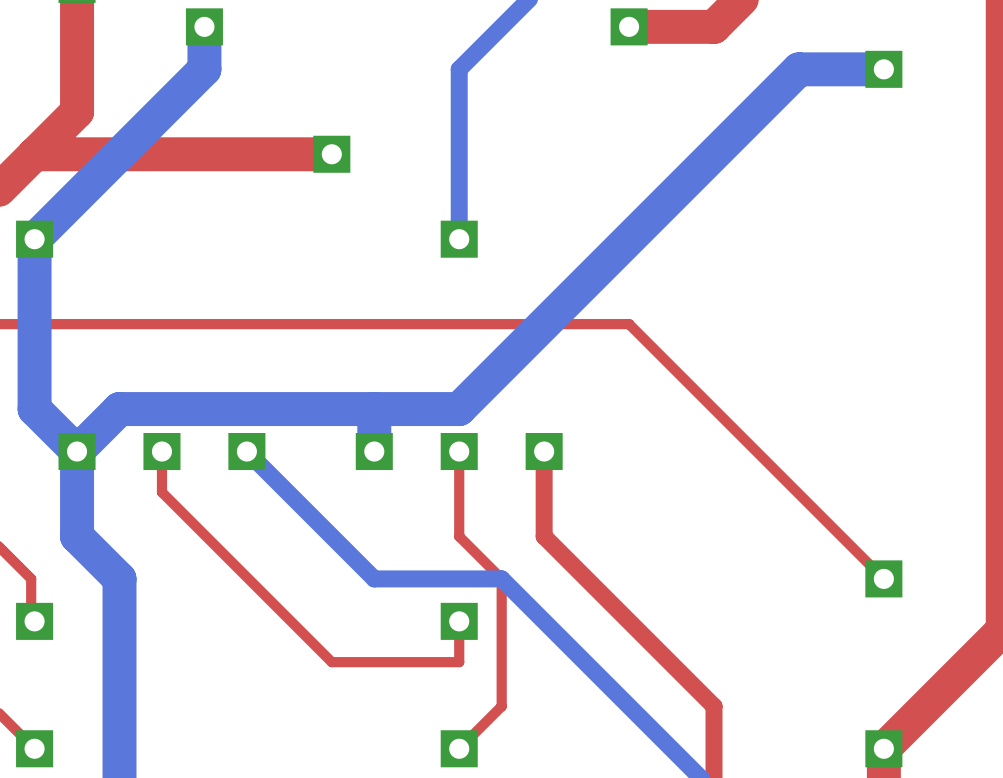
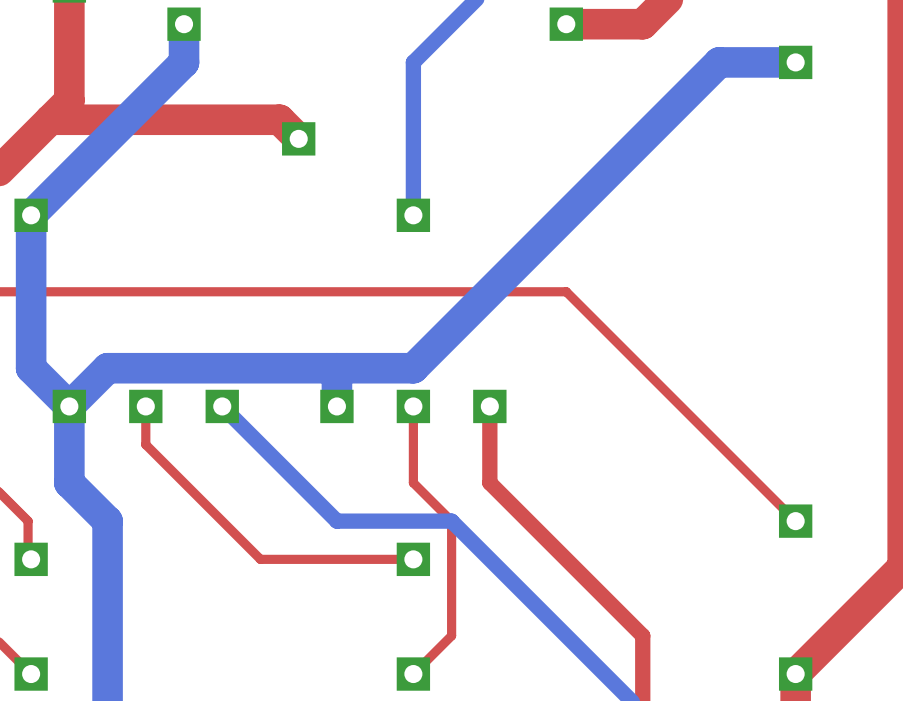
top track: none -> (50, 119) (279, 119) (298, 138)
top track: (204, 154) (331, 154) (34, 154) -> none
top track: (161, 492) (331, 662) (459, 662) (459, 621) -> (145, 443) (260, 559) (413, 559)

